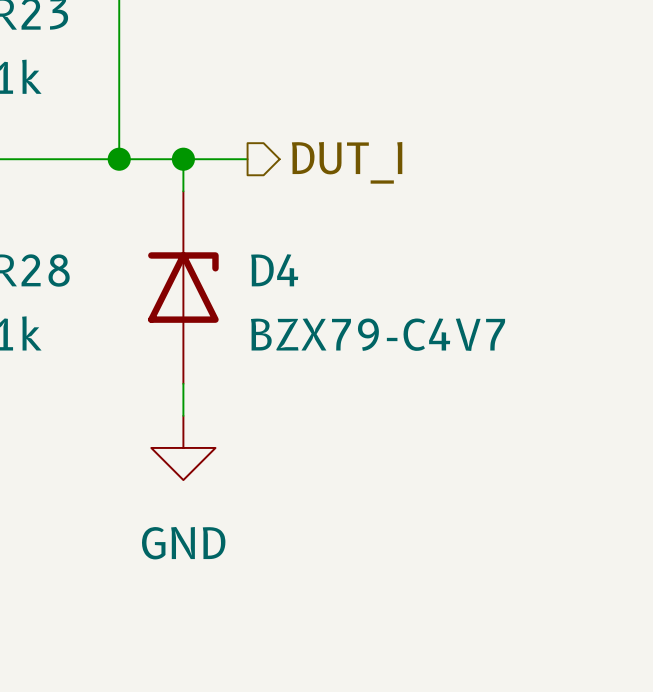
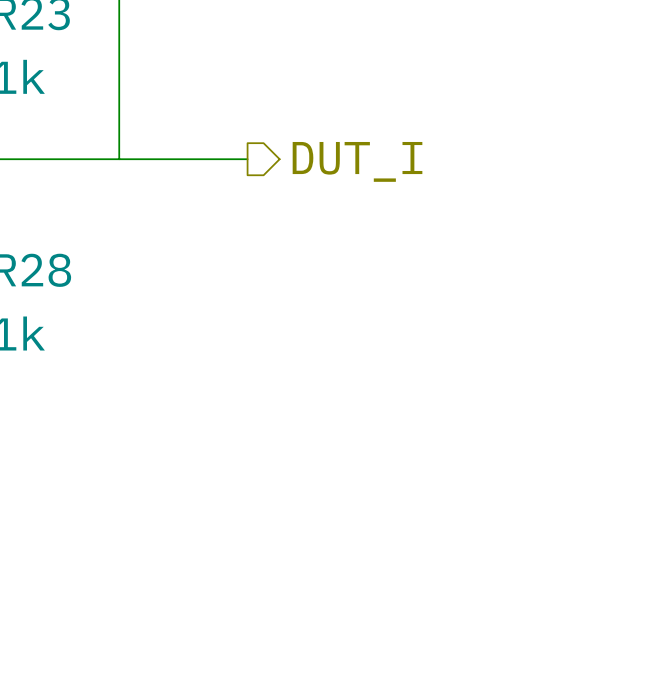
junction: (119, 159) -> none
wire: (183, 159) (183, 191) -> none
junction: (183, 159) -> none
D4: BZX79-C4V7 (183, 287) -> none
wire: (183, 383) (183, 415) -> none
power symbol: GND (183, 447) -> none

